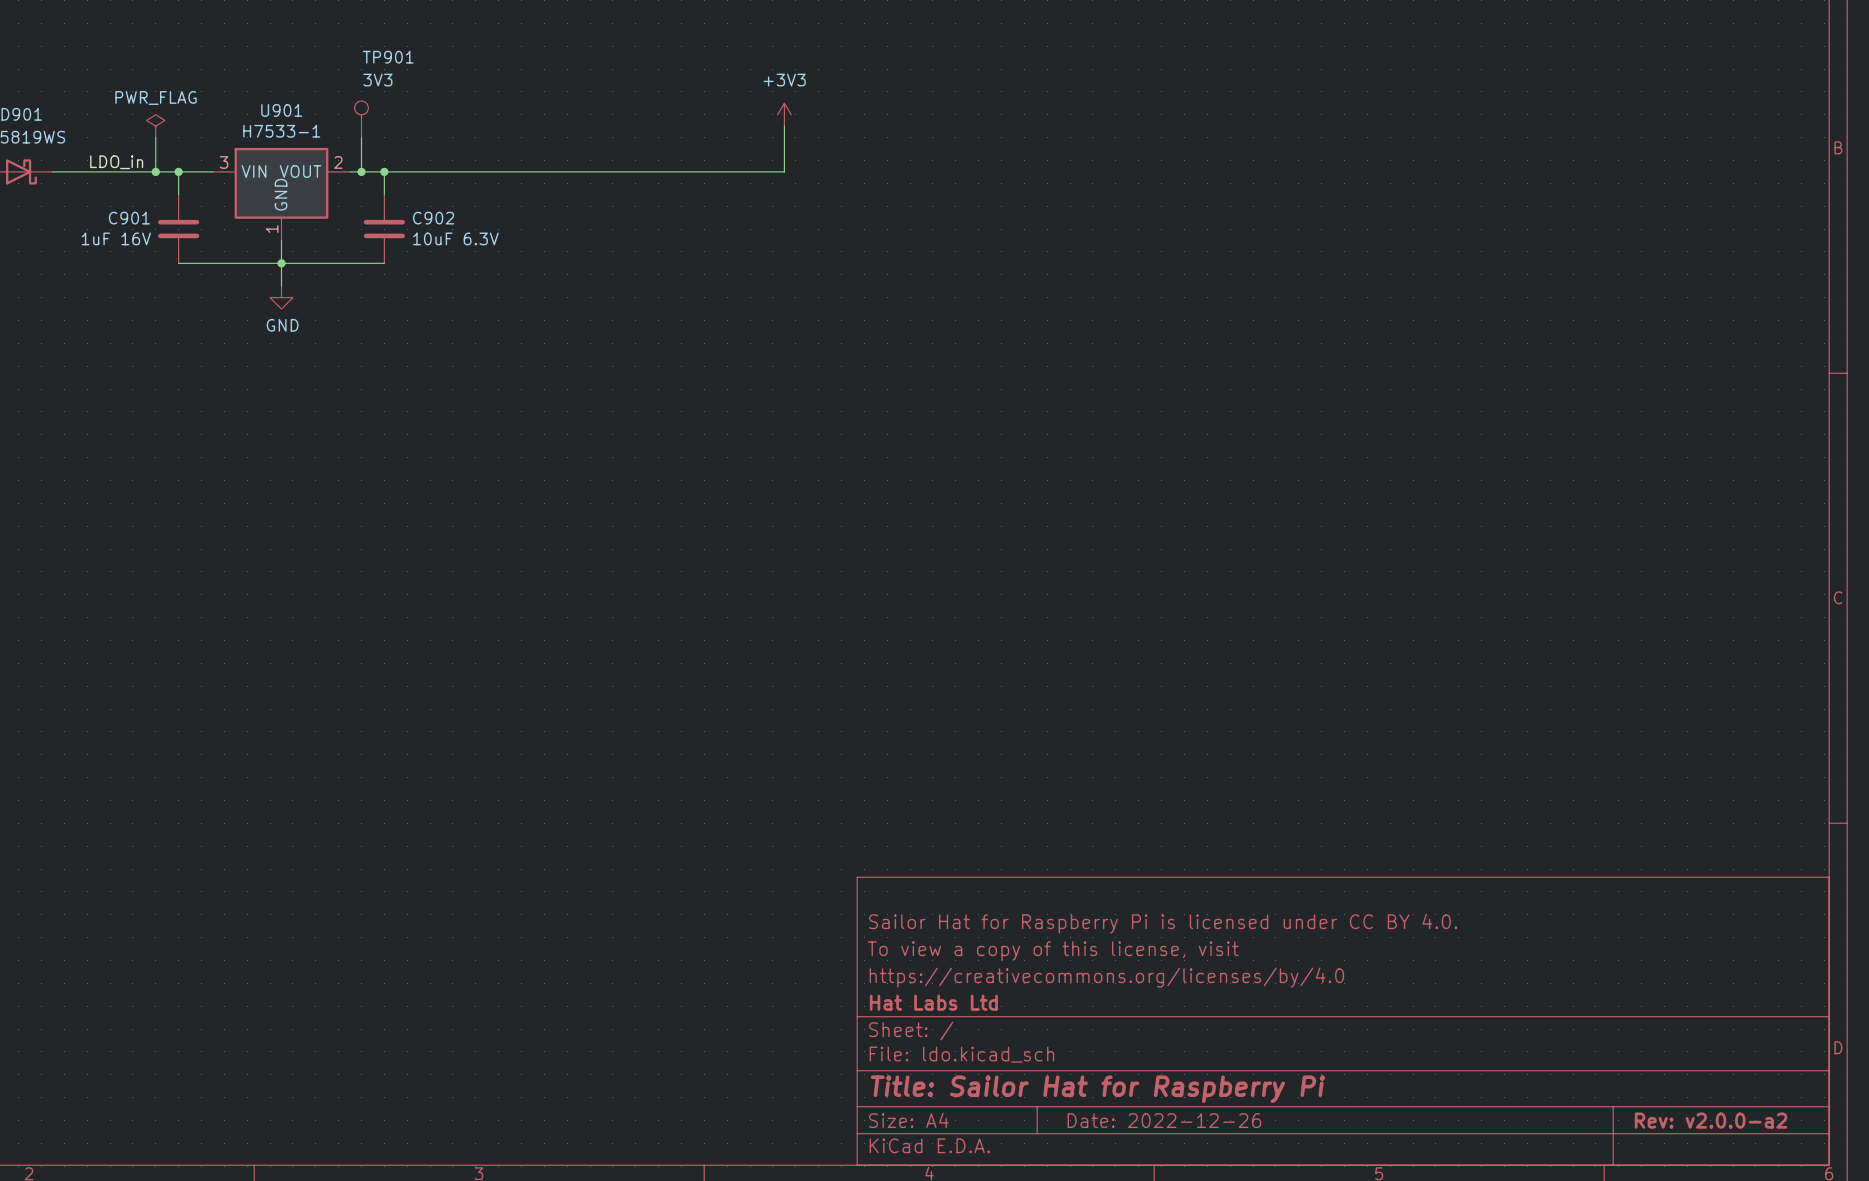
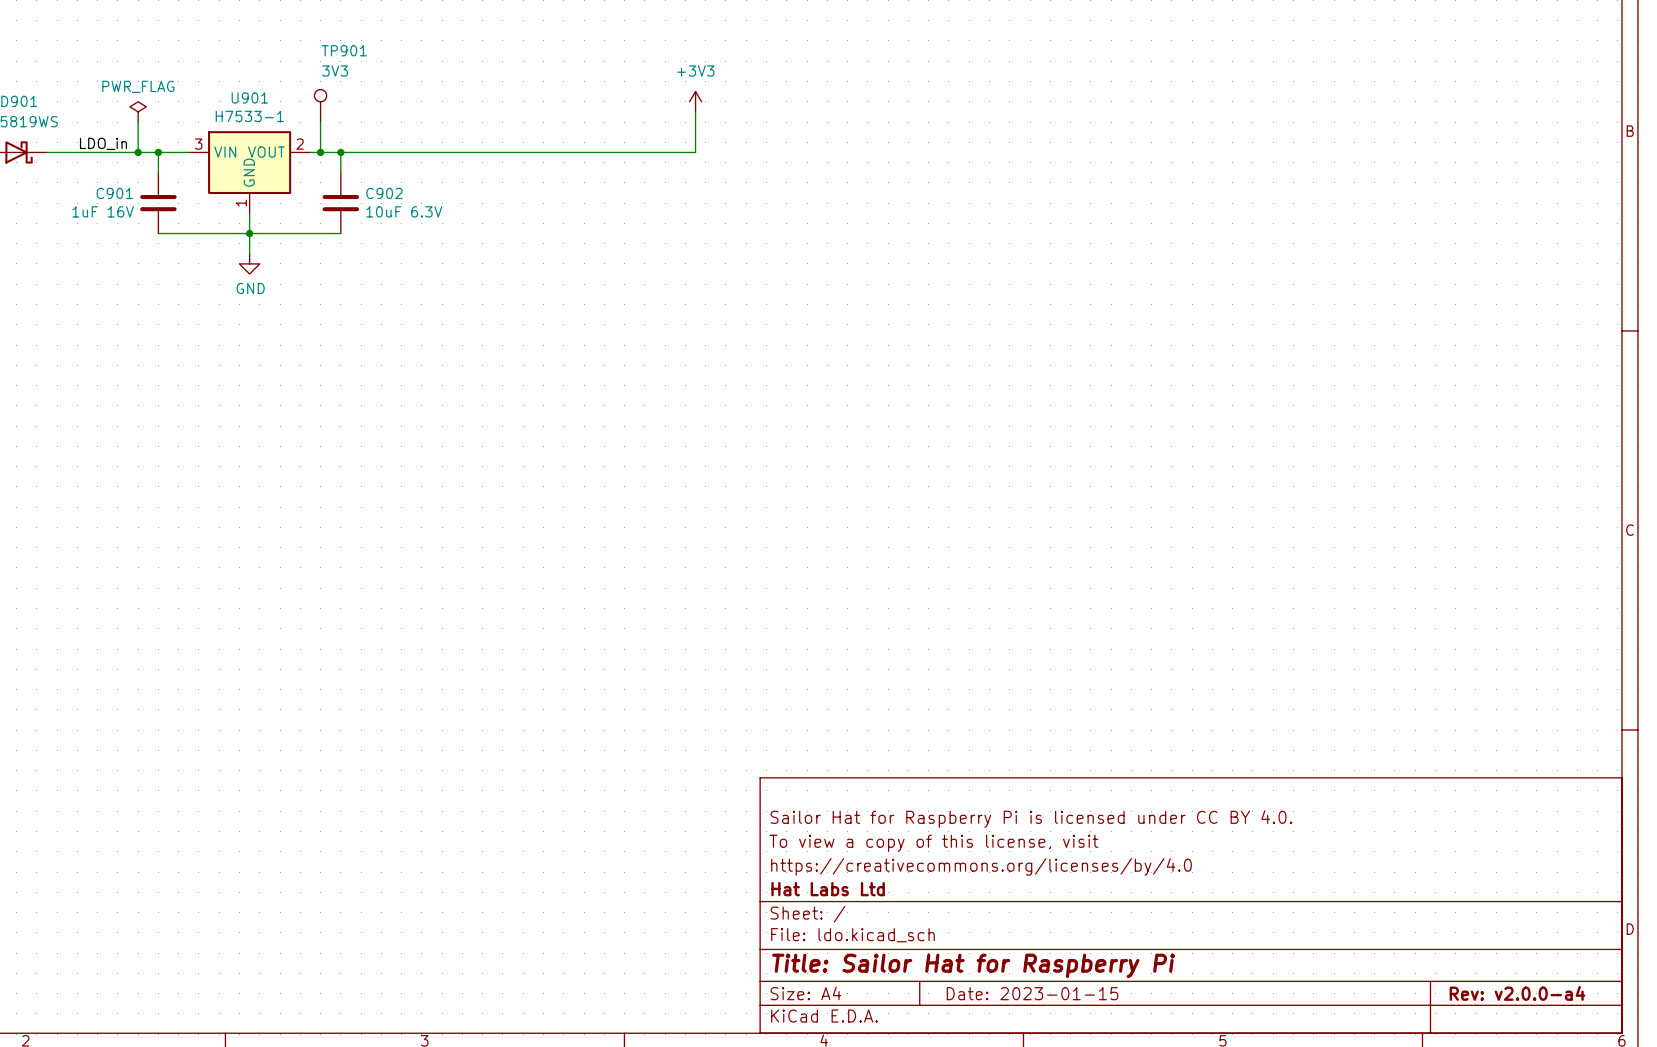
title block: Date: 2022-12-26 (1164, 1120) -> Date: 2023-01-15 (1032, 993)
title block: Rev: v2.0.0-a2 (1711, 1120) -> Rev: v2.0.0-a4 (1517, 993)

